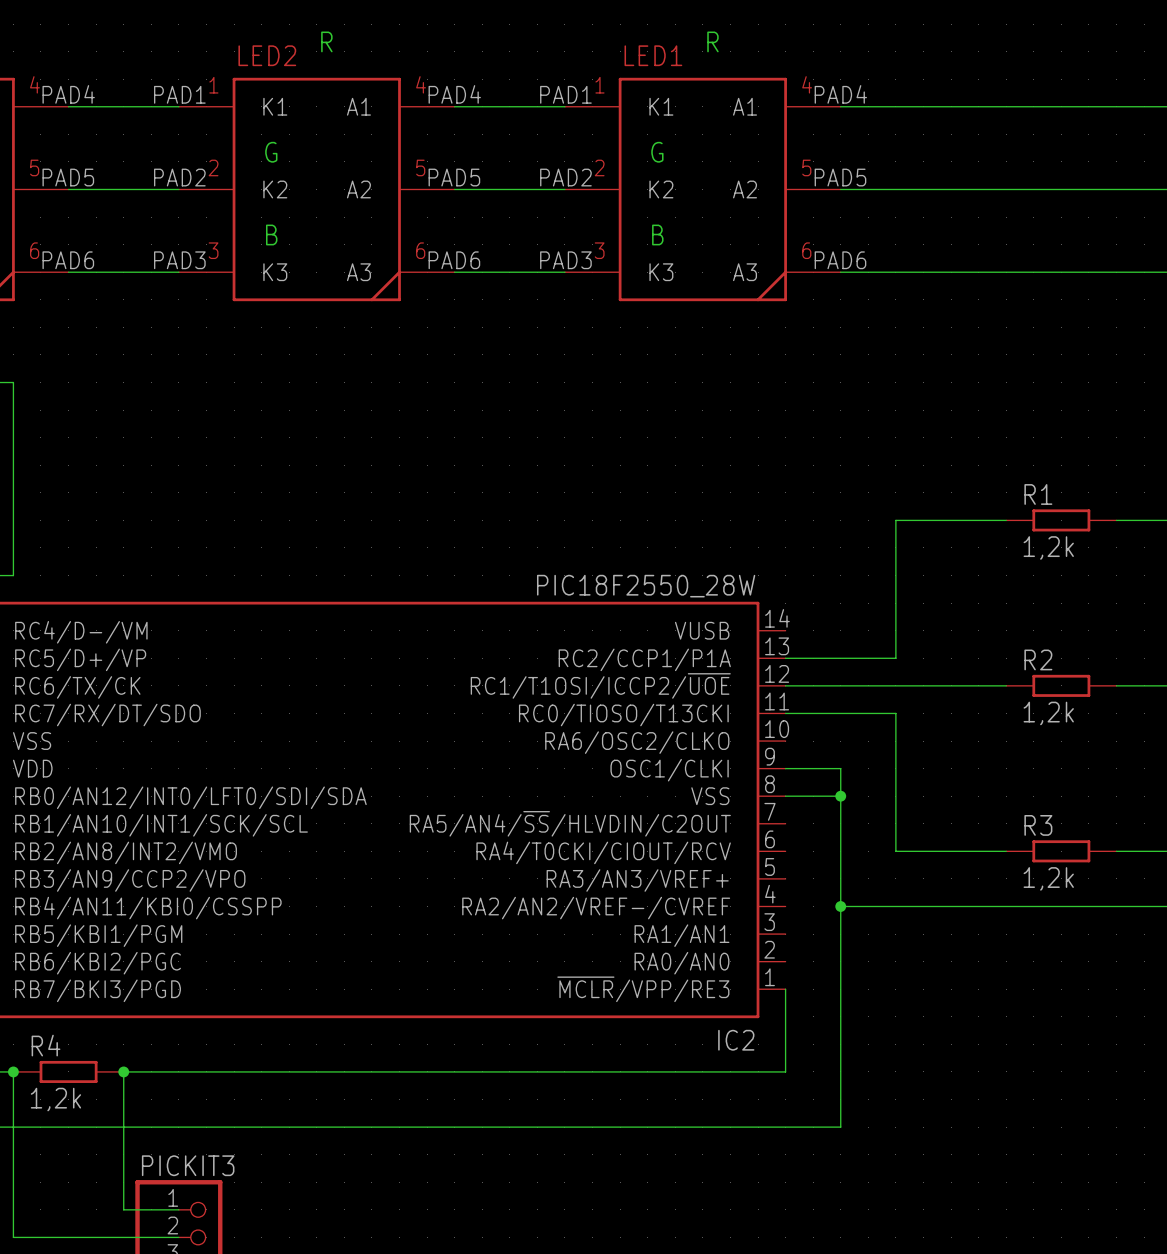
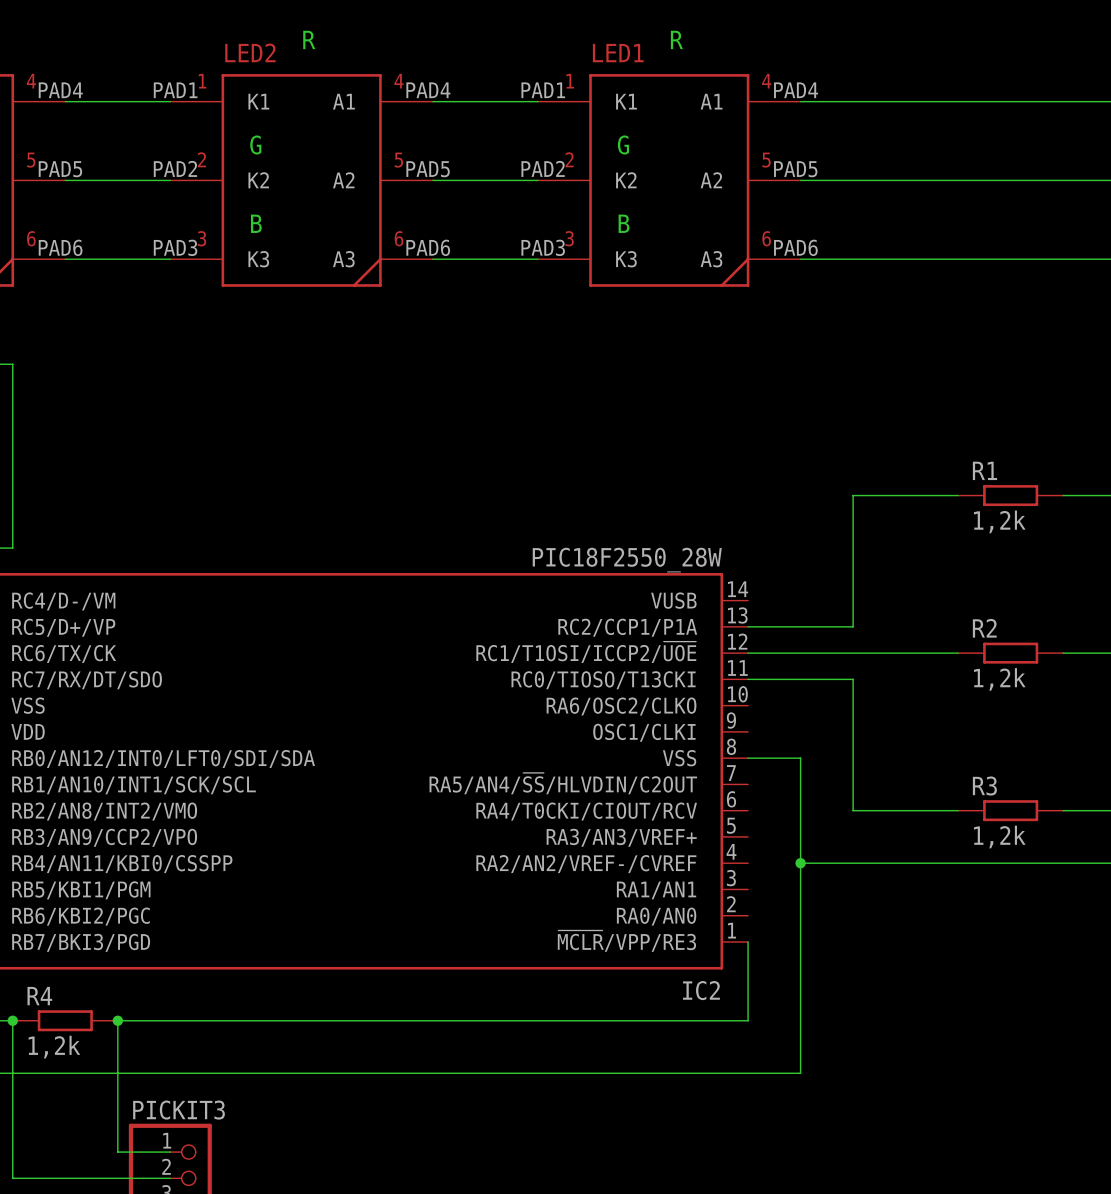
wire: (785, 768) (840, 768) (840, 796) -> none
junction: (840, 796) -> none

